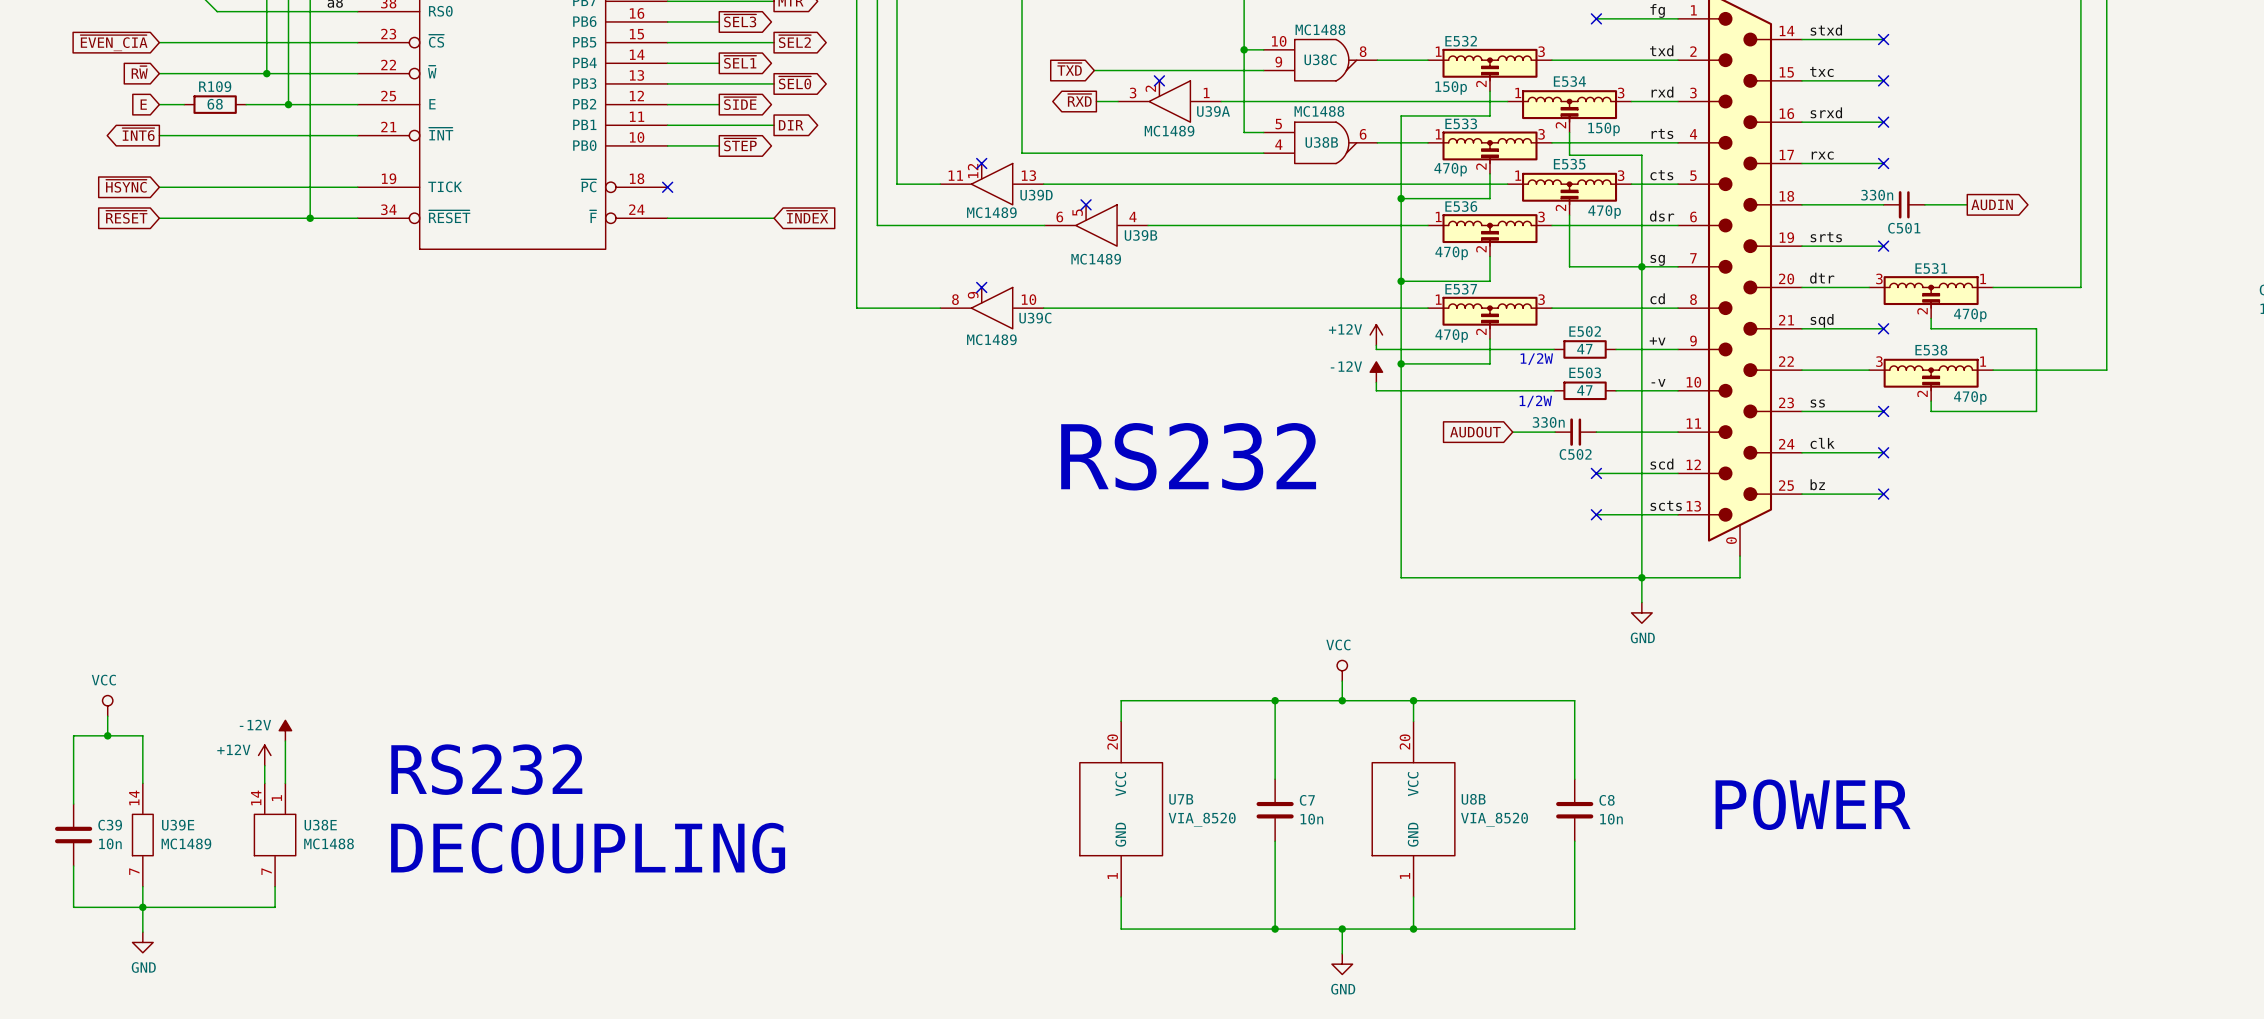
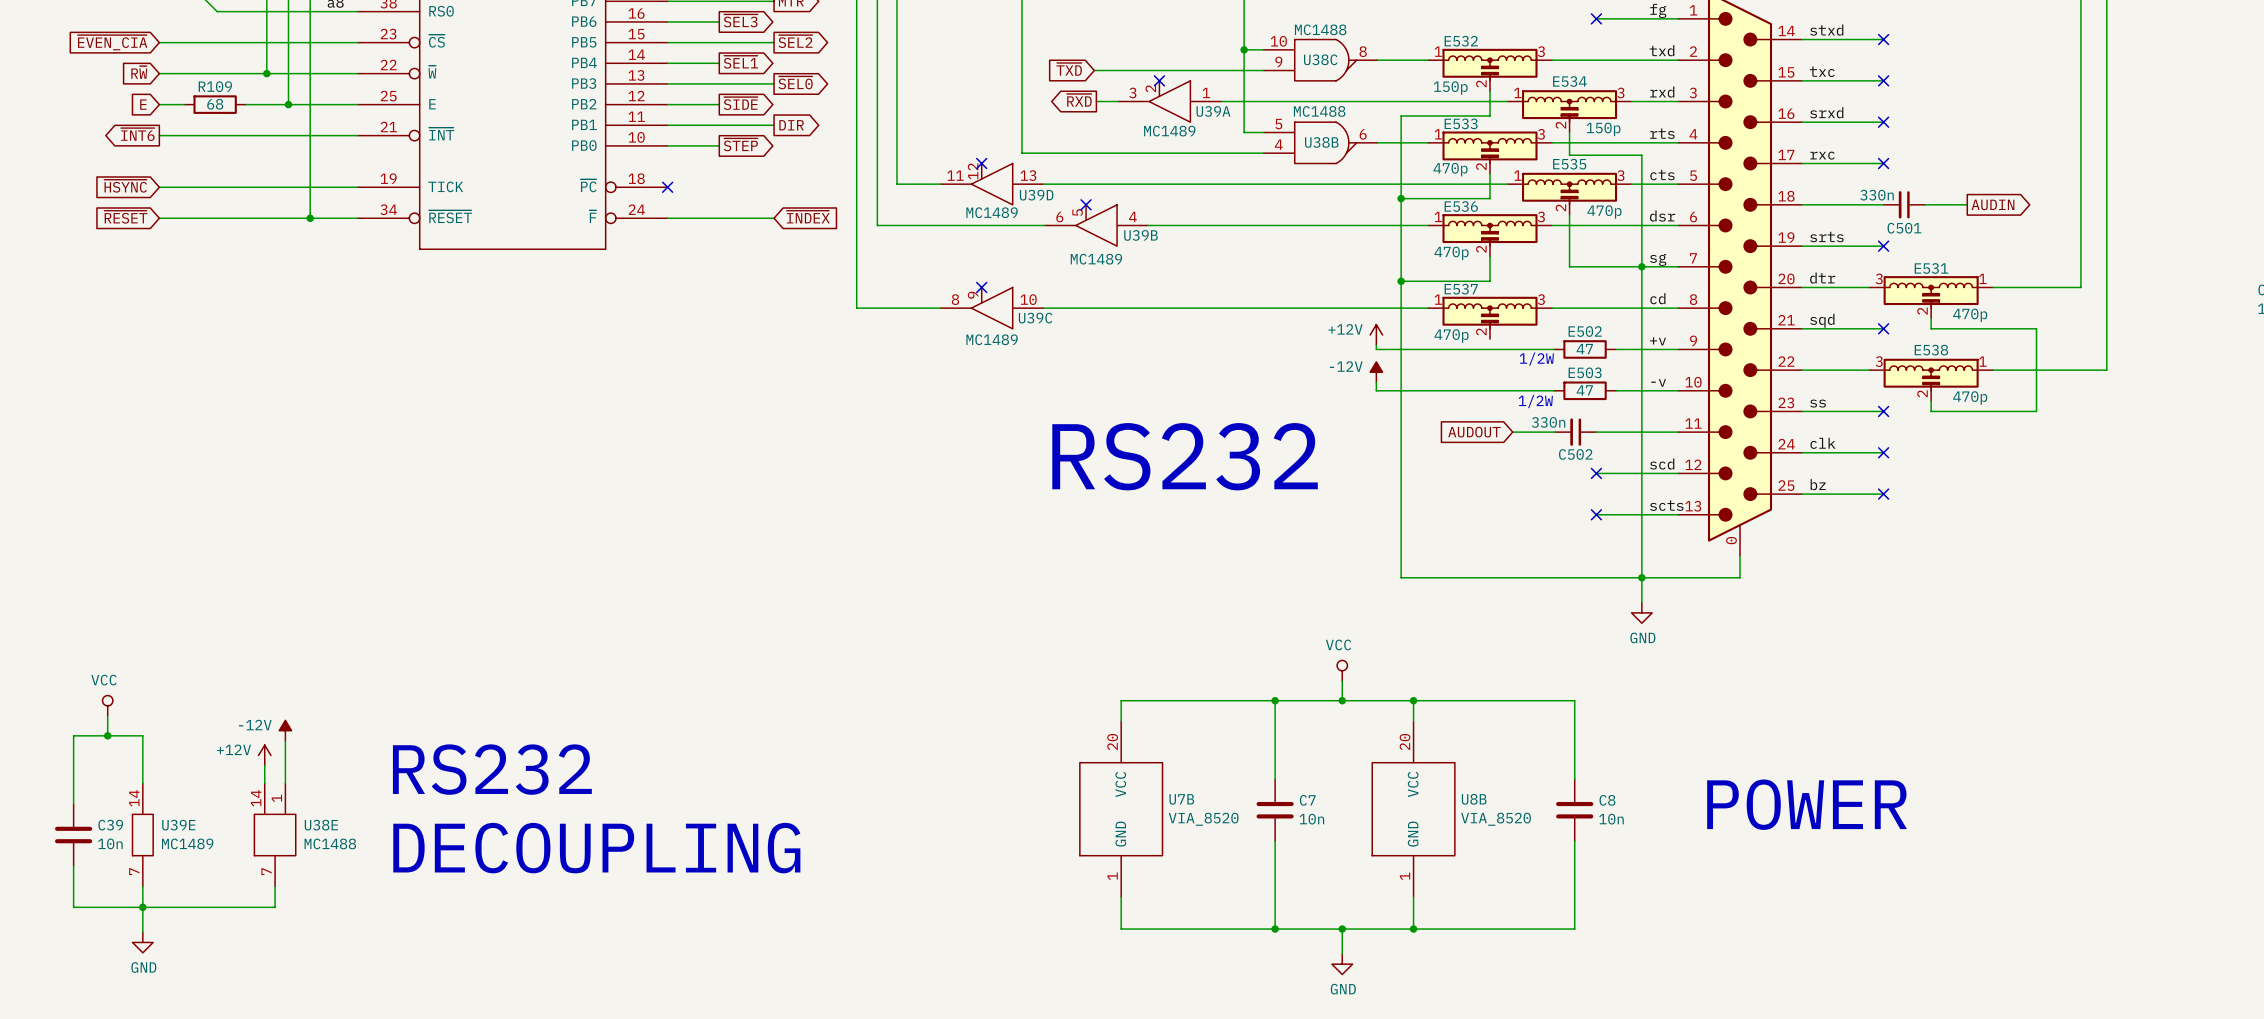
wire: (1490, 339) (1490, 363) (1401, 363) -> none
junction: (1401, 363) -> none

